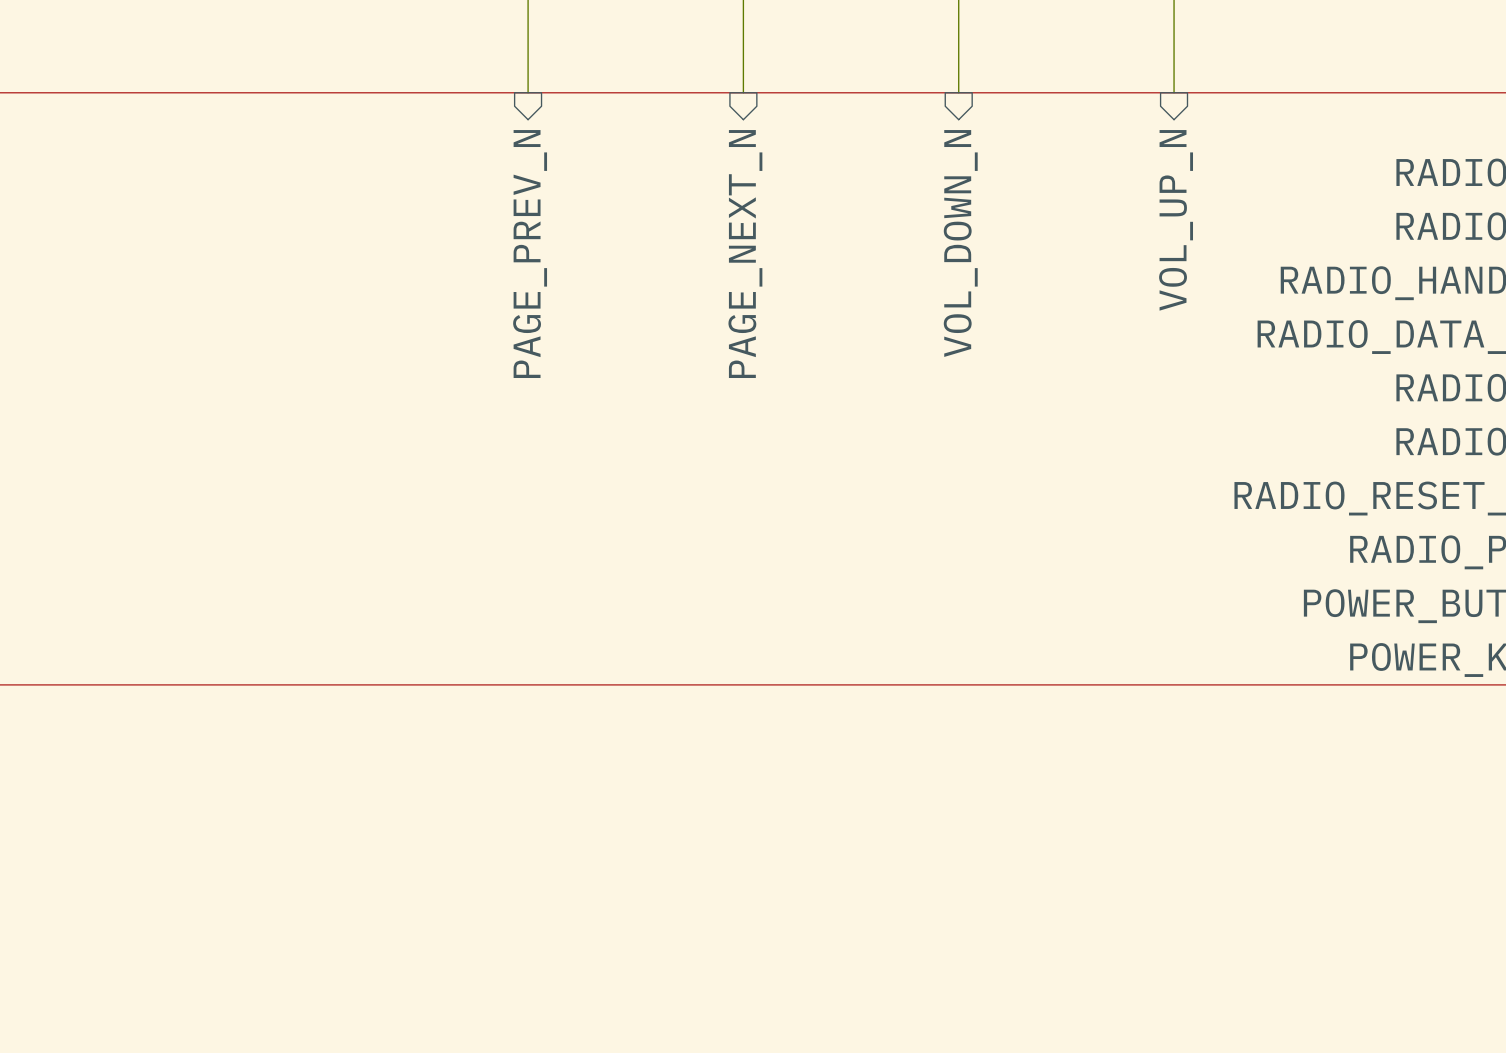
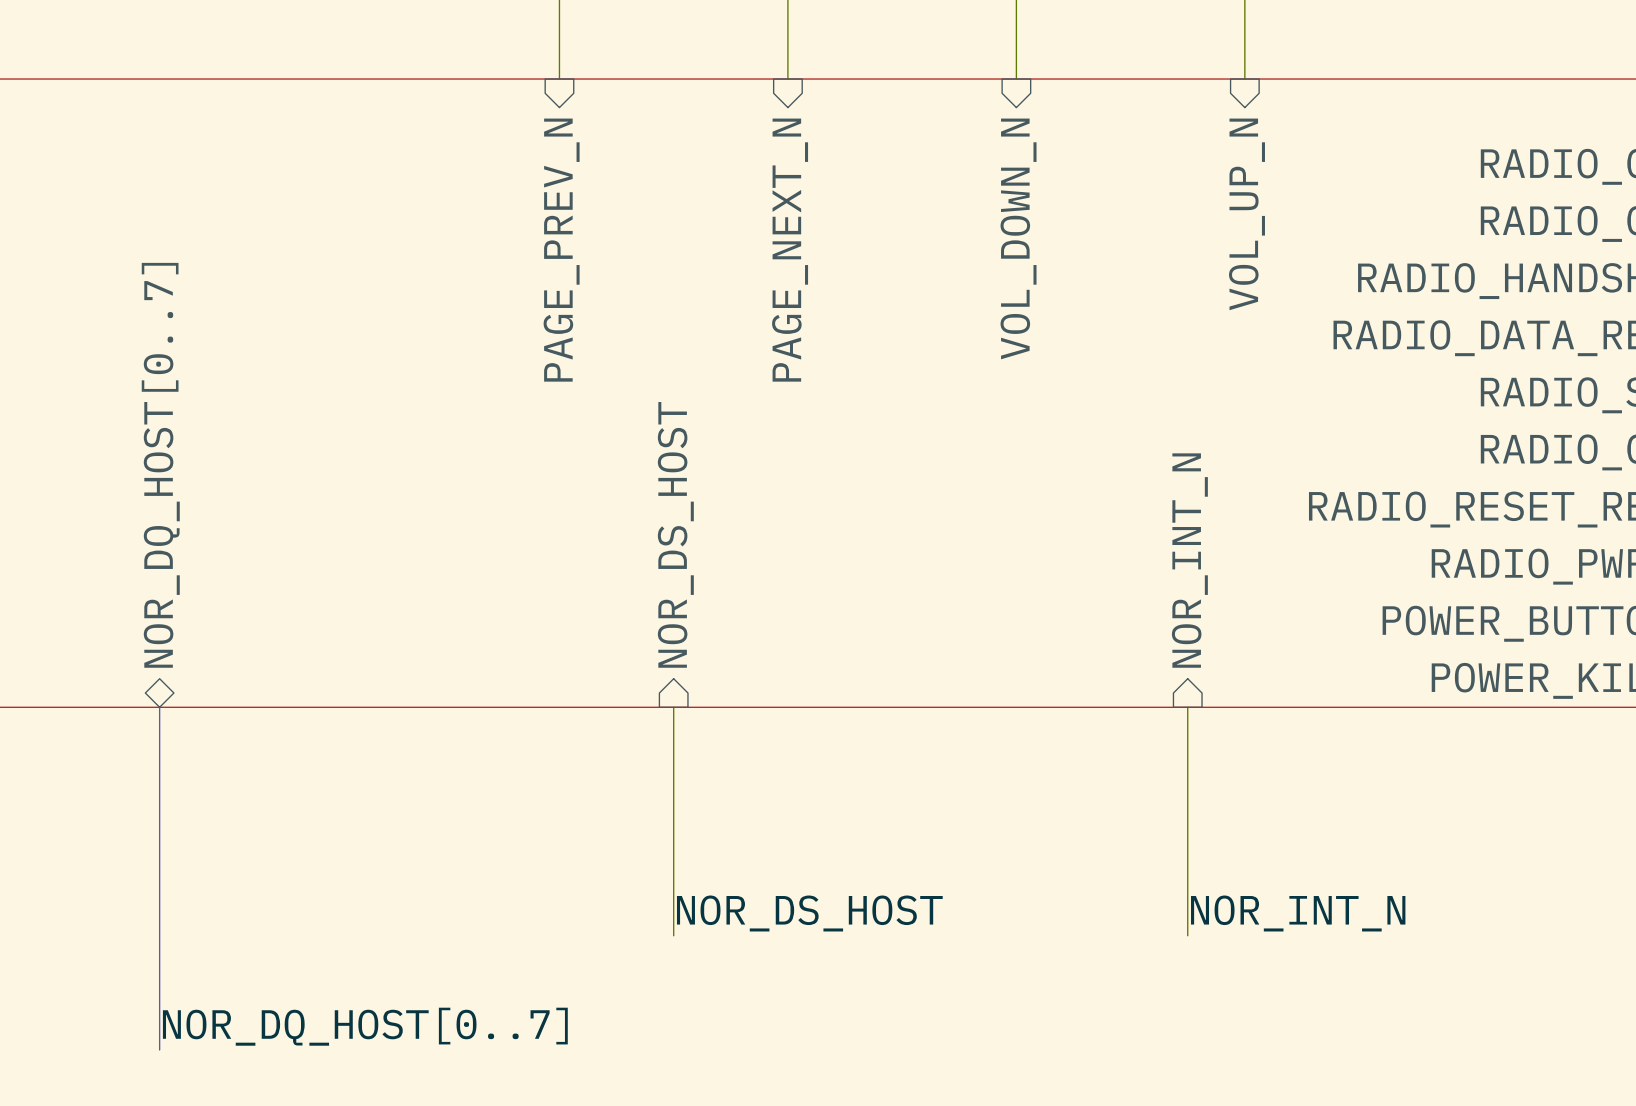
sheet pin: none -> NOR_DQ_HOST[0..7] (160, 465)
sheet pin: none -> NOR_DS_HOST (675, 534)
sheet pin: none -> NOR_INT_N (1189, 560)
bus: none -> (159, 707) (159, 1050)
wire: none -> (673, 707) (673, 935)
wire: none -> (1187, 707) (1187, 935)
label: none -> NOR_DS_HOST (809, 913)
label: none -> NOR_INT_N (1298, 913)
label: none -> NOR_DQ_HOST[0..7] (365, 1026)

